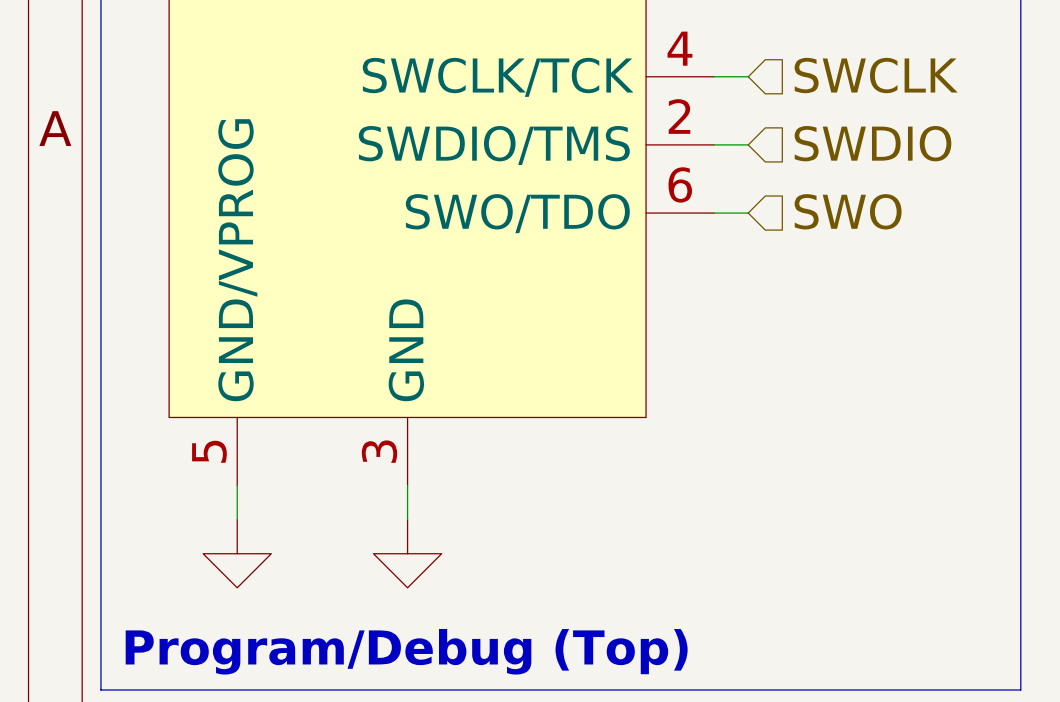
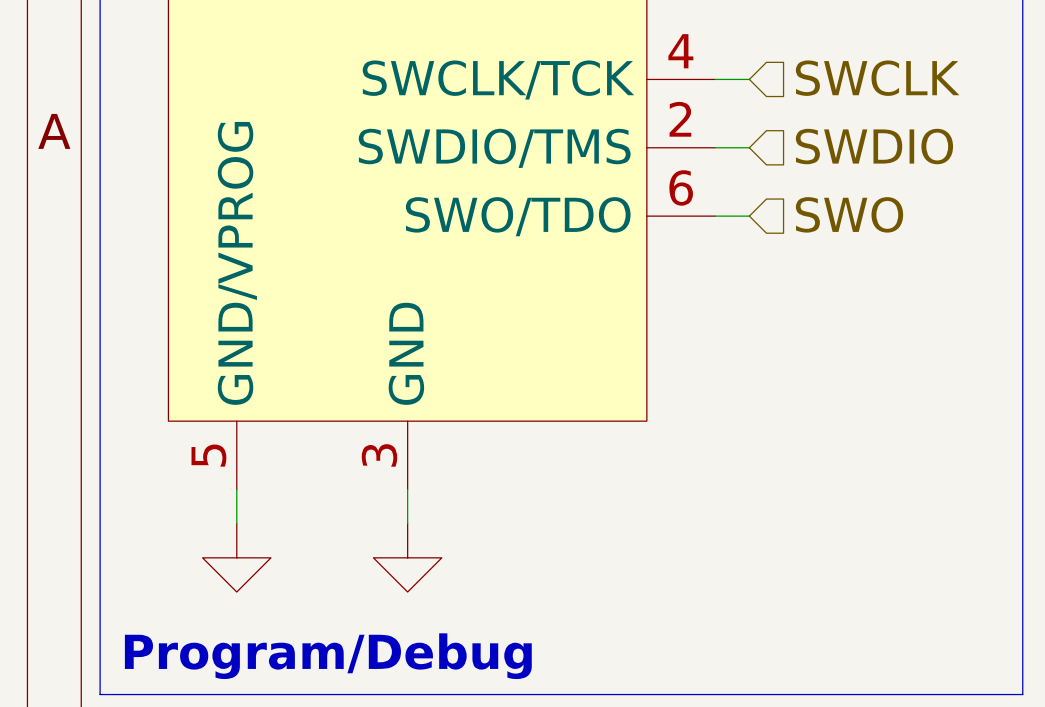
text: Program/Debug (Top) (406, 651) -> Program/Debug (328, 656)

